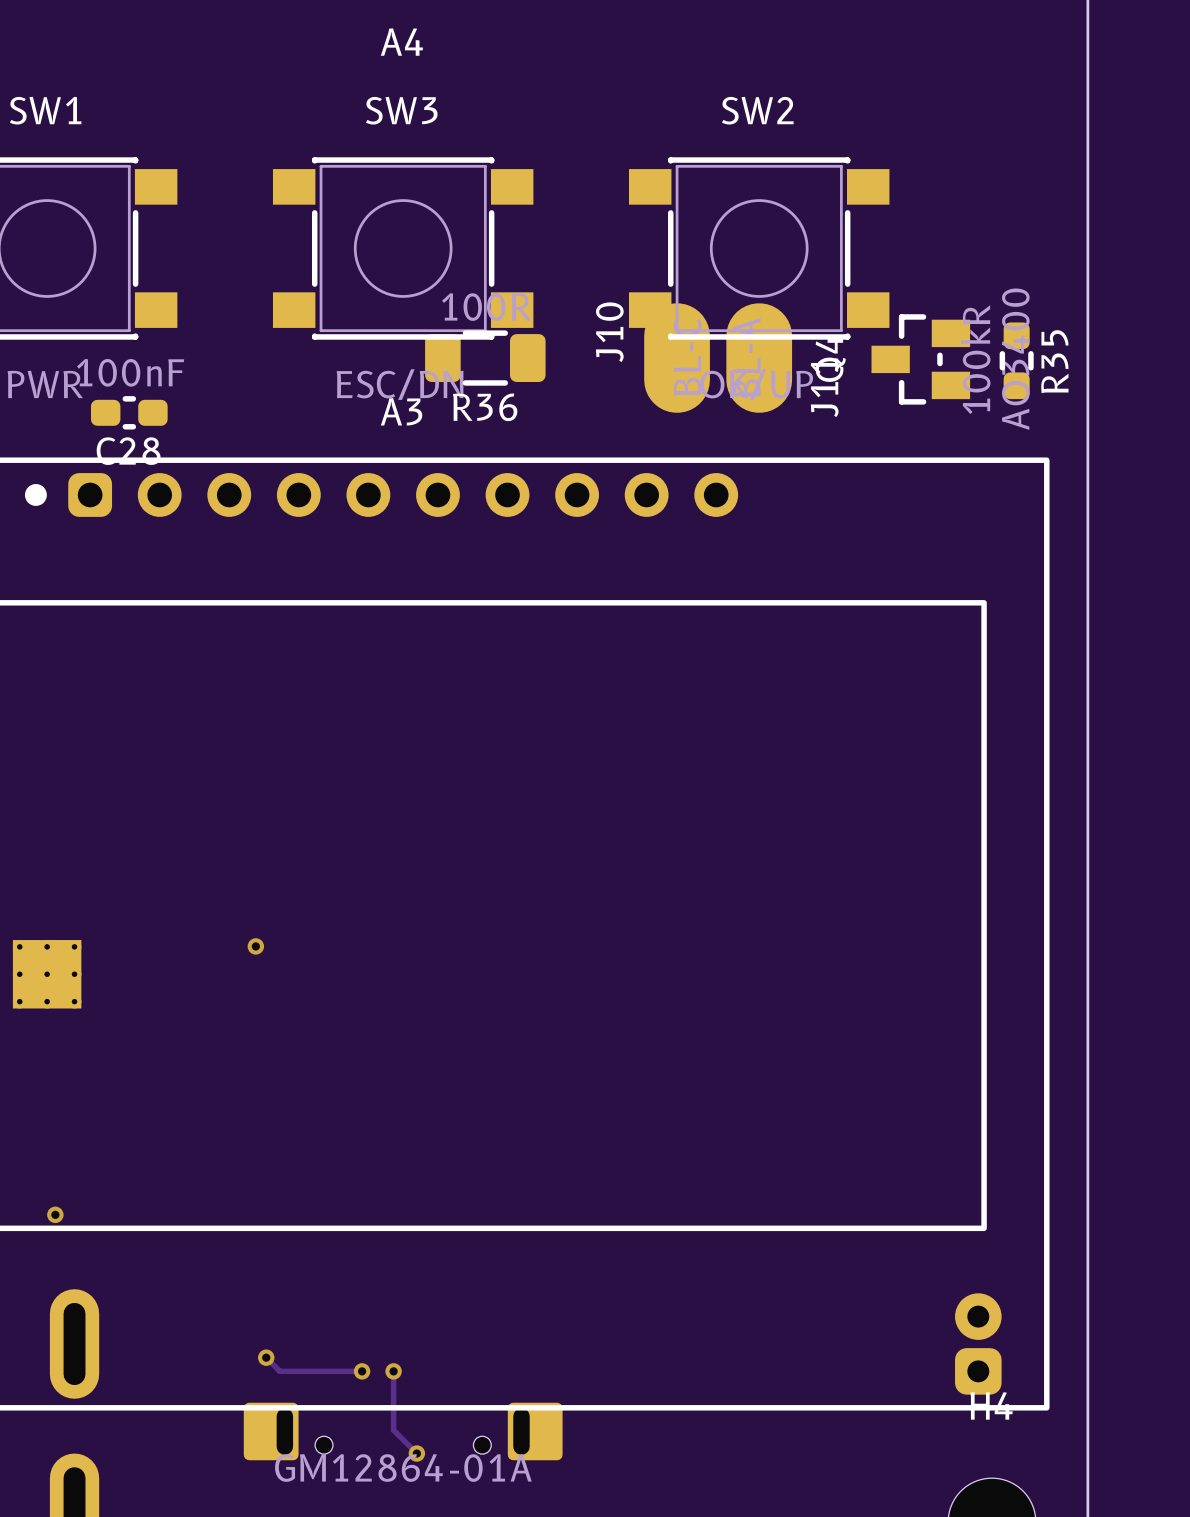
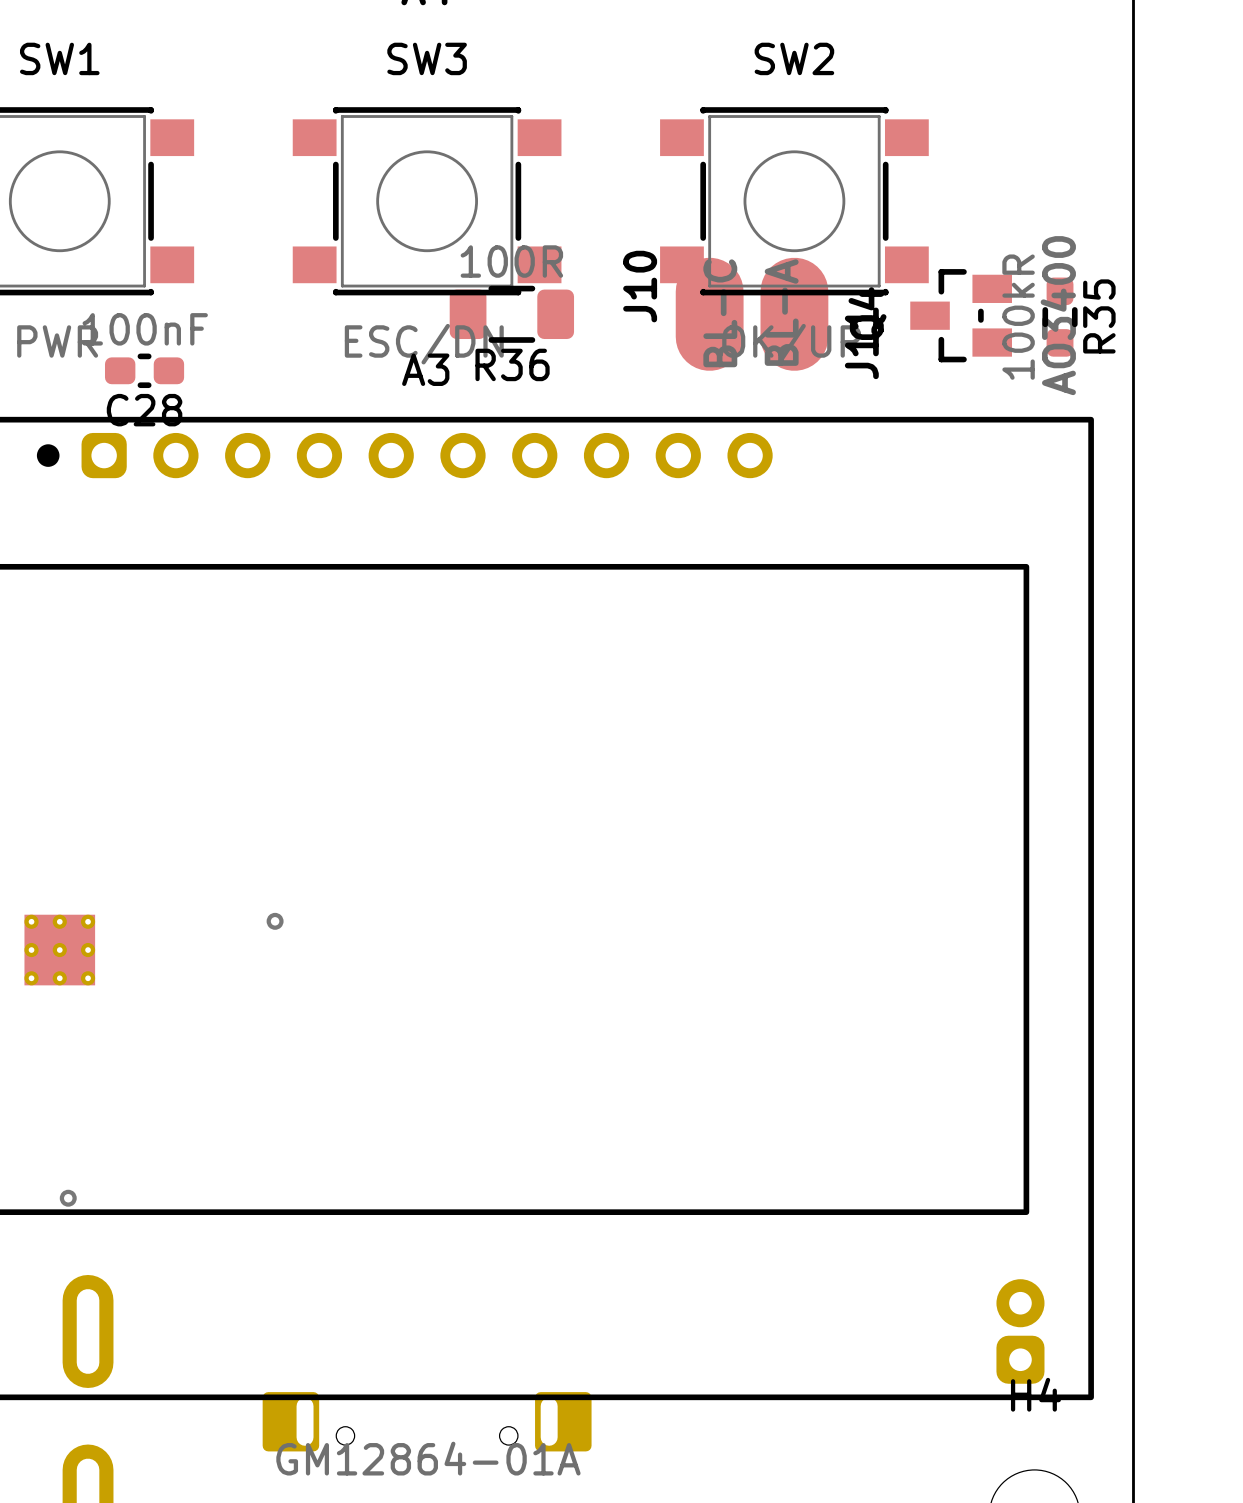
track: (266, 1357) (279, 1371) (362, 1371) -> none
via: (266, 1357) -> none
via: (362, 1371) -> none
track: (393, 1371) (393, 1430) (416, 1453) -> none
via: (393, 1371) -> none
via: (416, 1453) -> none

